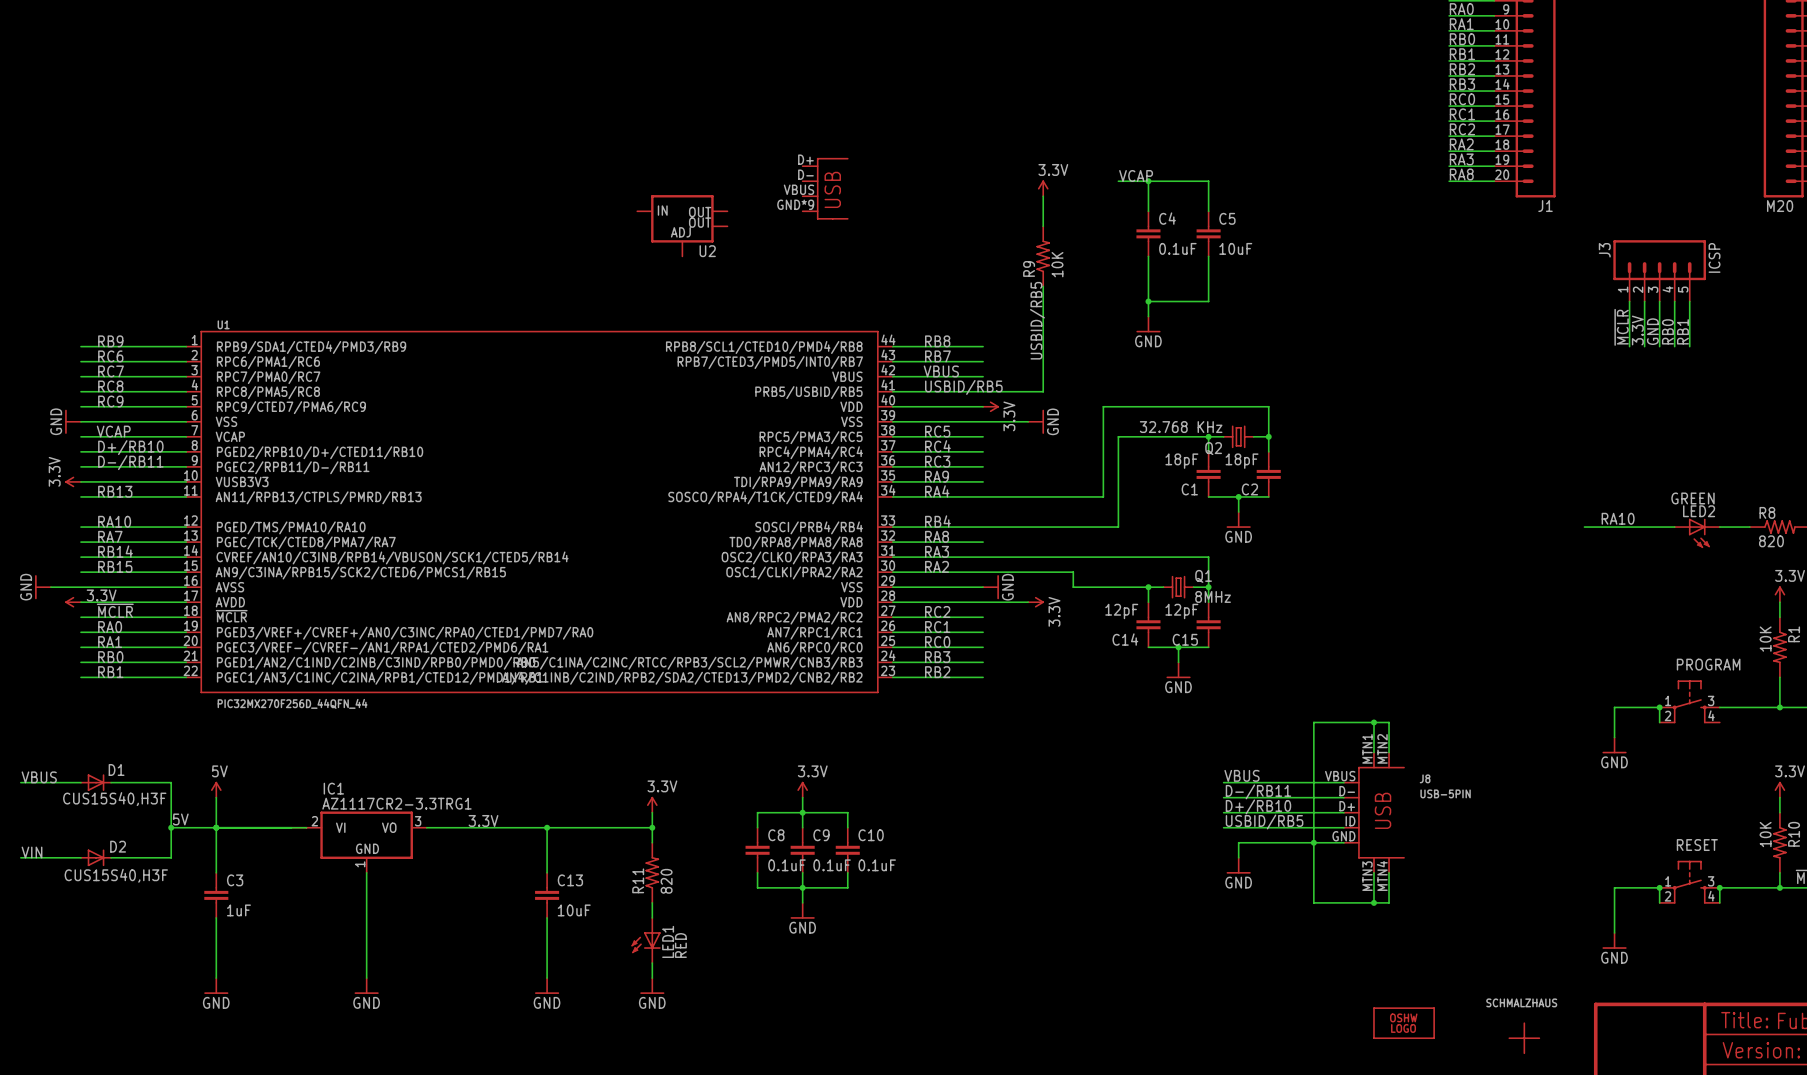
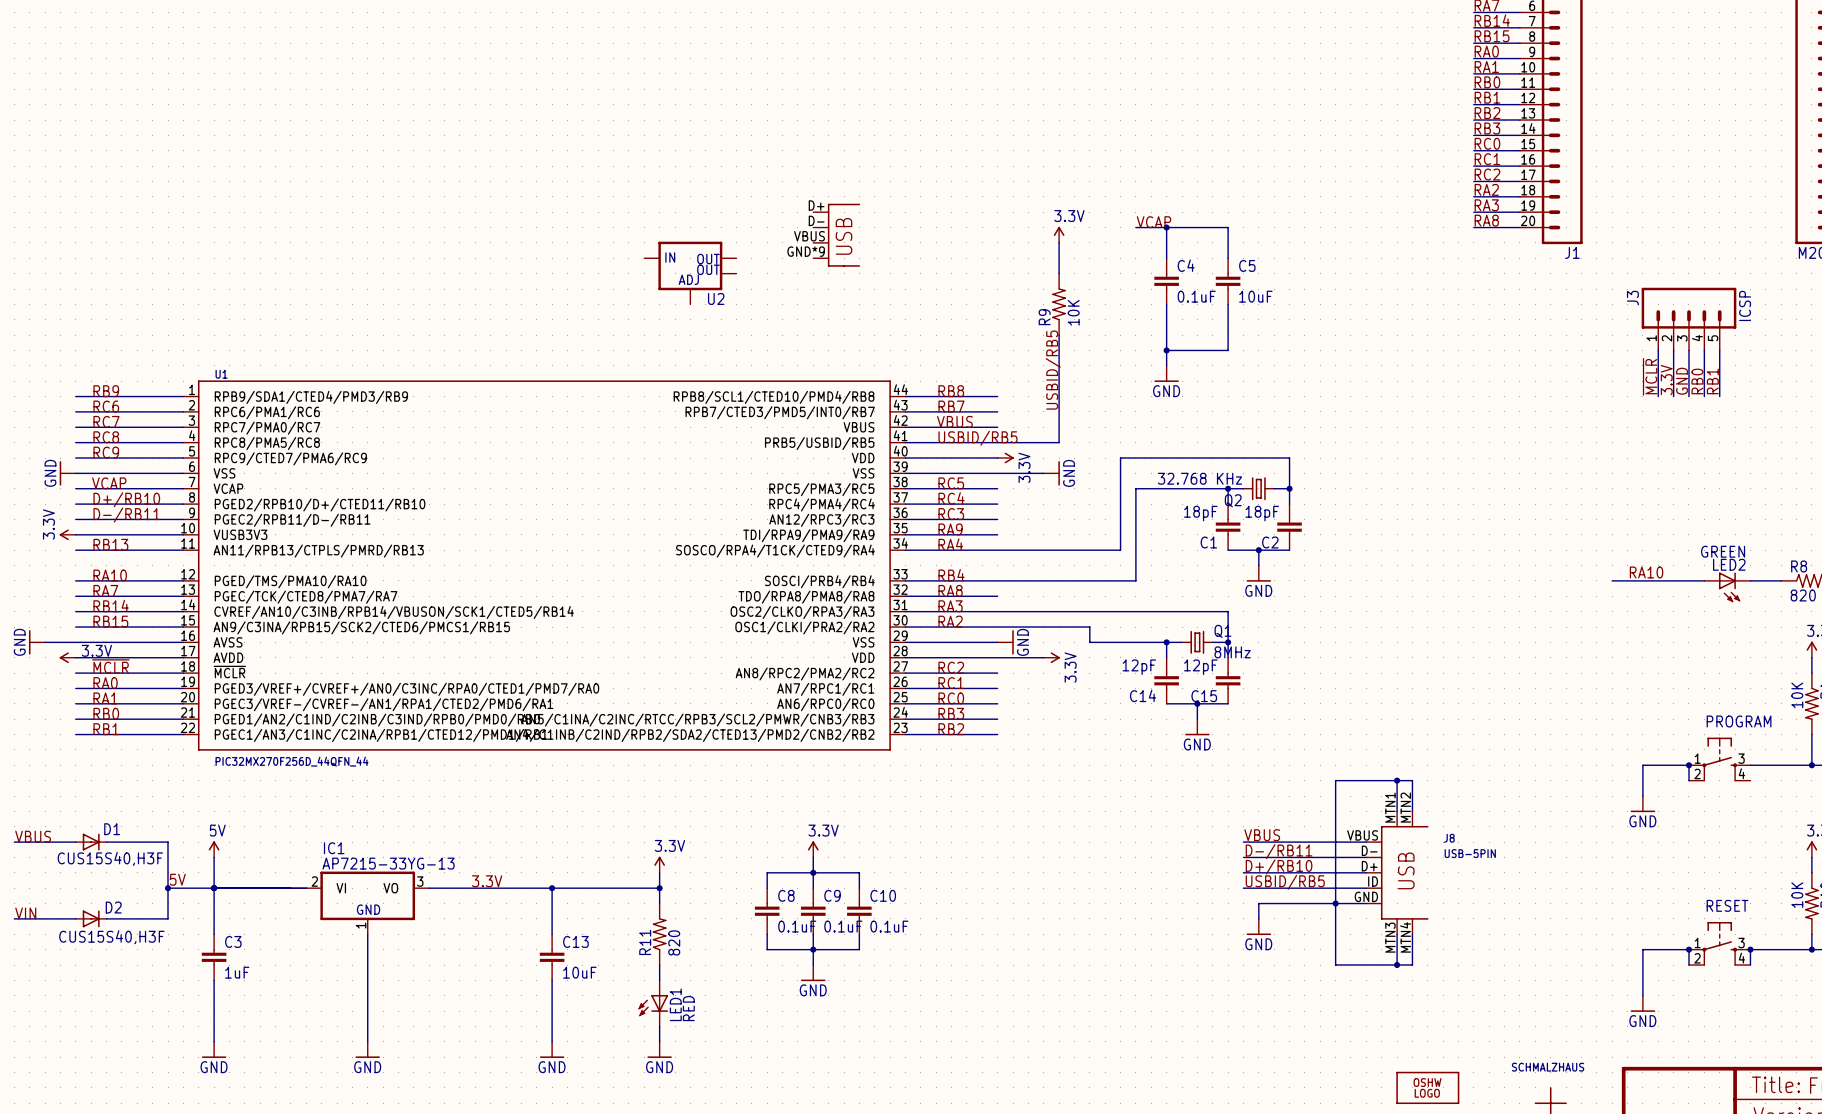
IC1 value: AZ1117CR2-3.3TRG1 (396, 803) -> AP7215-33YG-13 (388, 863)

